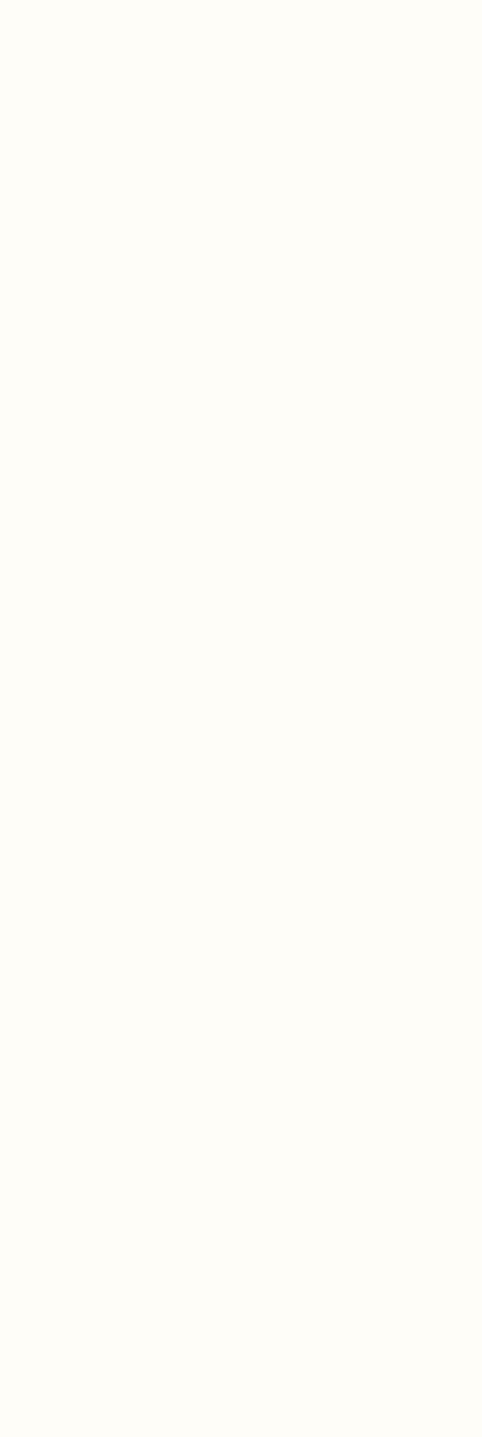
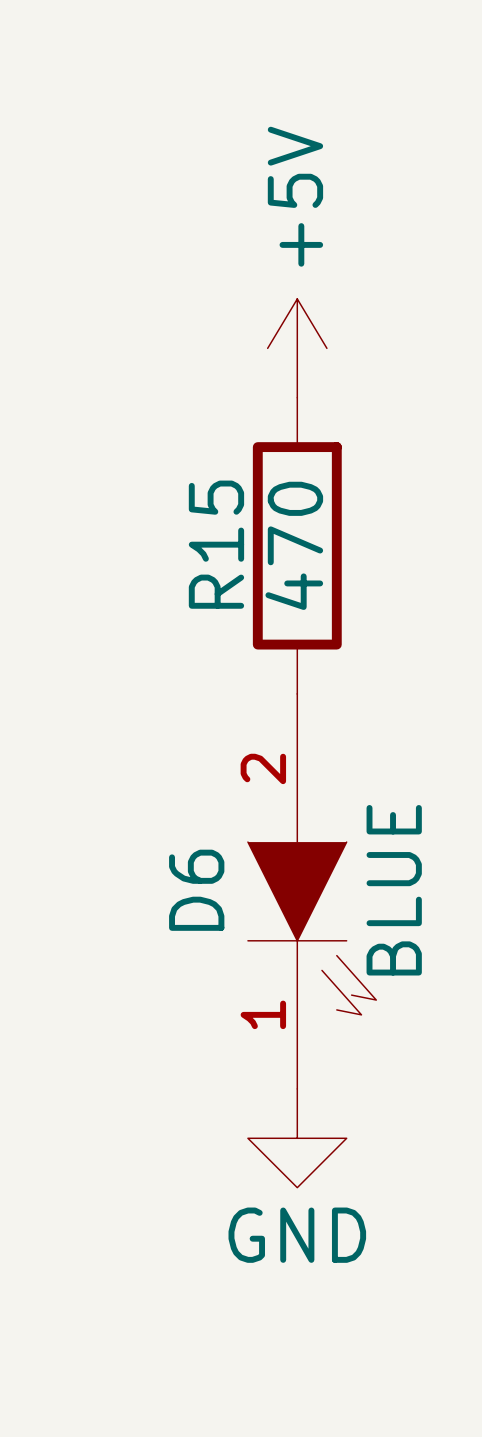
power symbol: none -> +5V (297, 348)
R15: none -> 470 (297, 545)
D6: none -> BLUE (312, 891)
power symbol: none -> GND (297, 1138)

